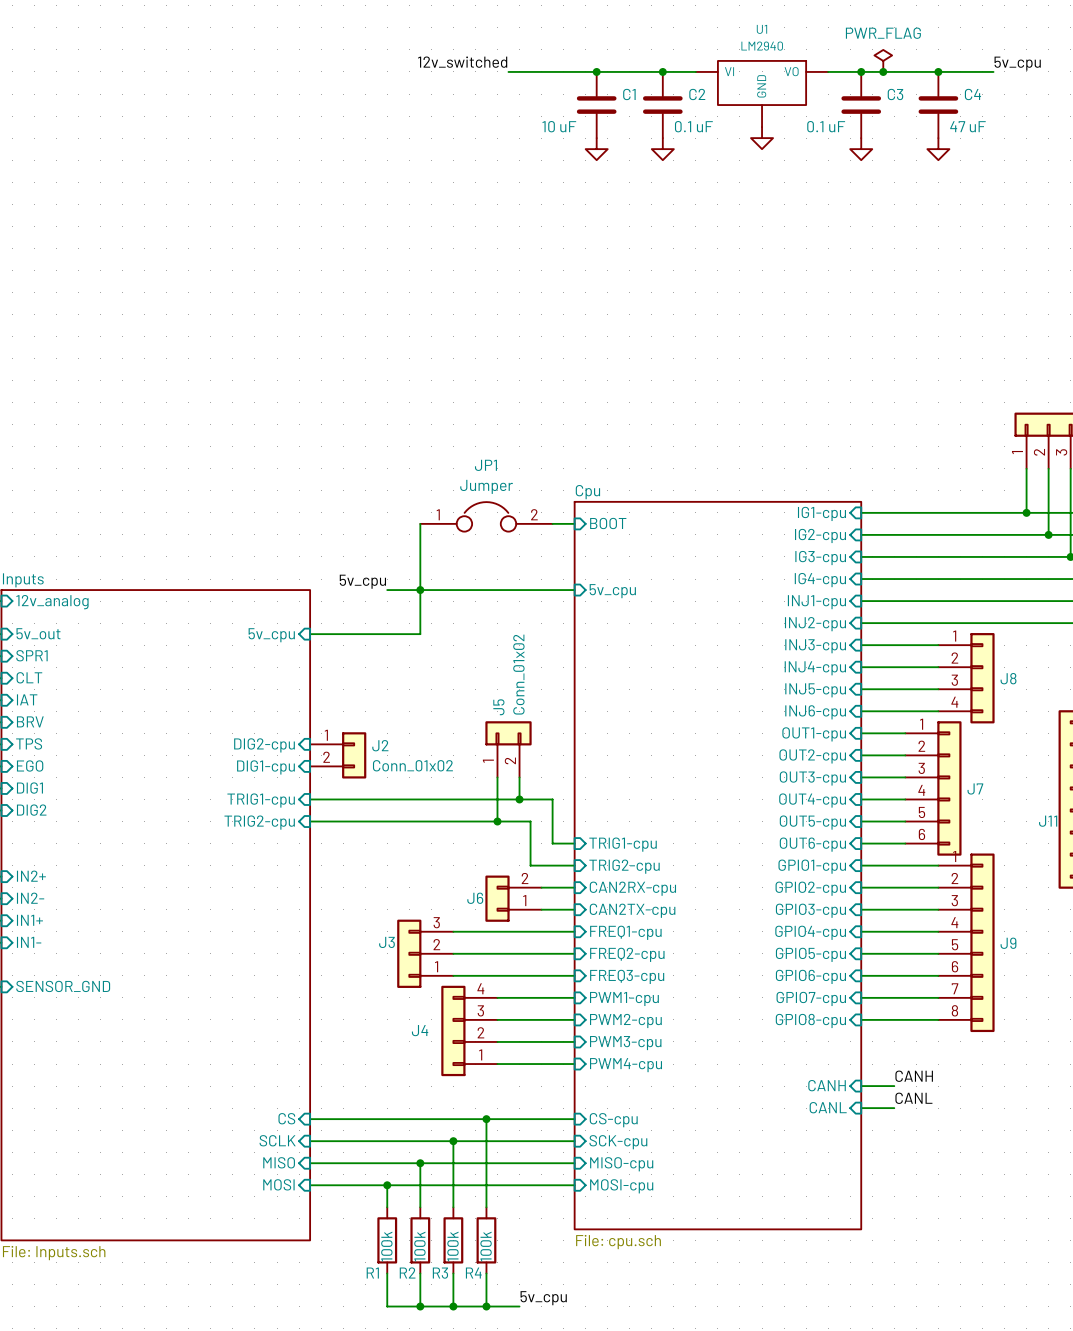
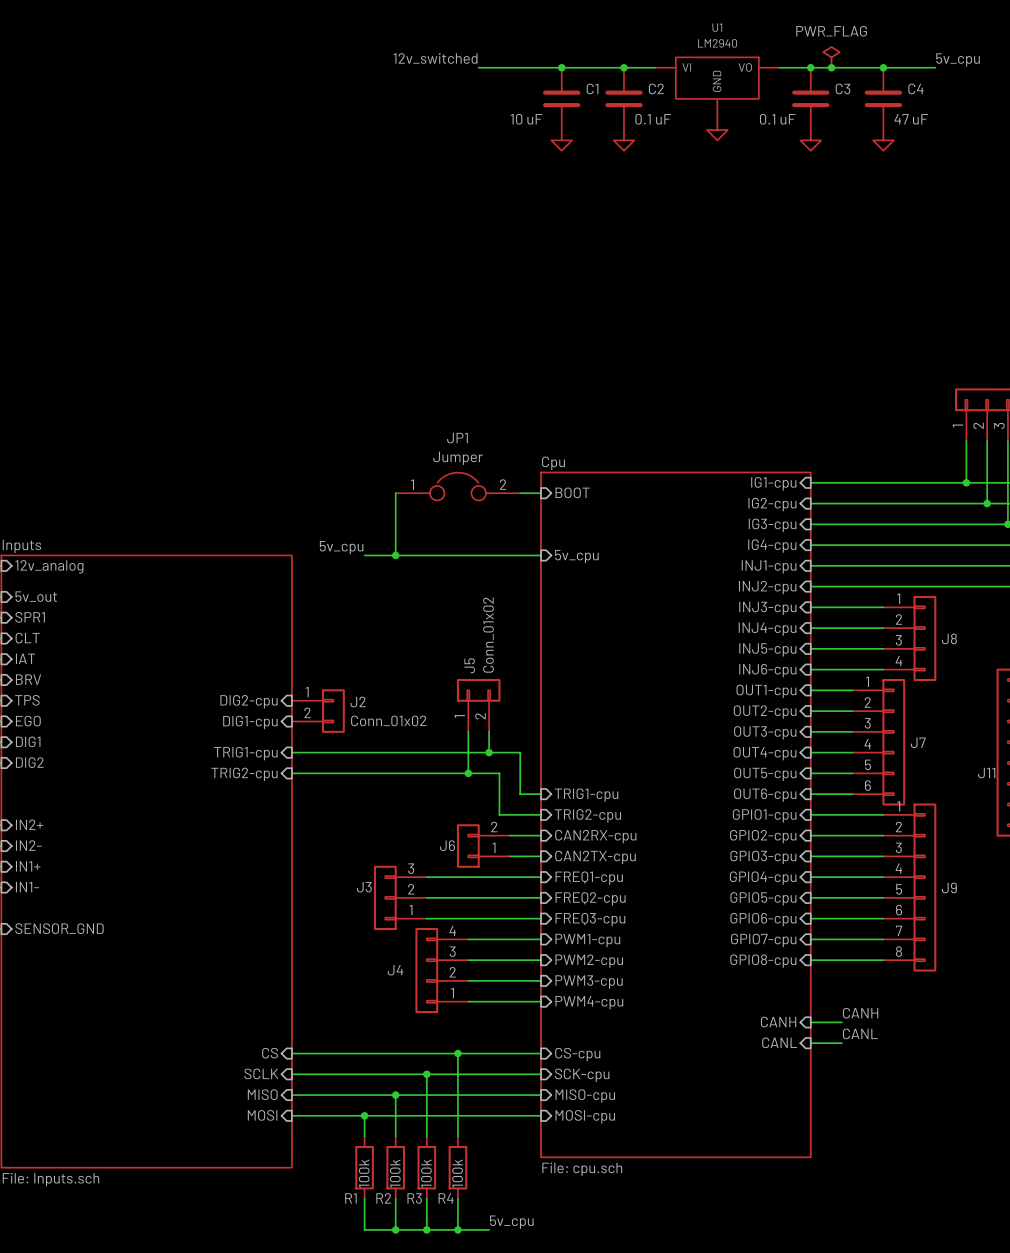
wire: (420, 590) (420, 634) (310, 634) -> none
sheet pin: 5v_cpu (271, 635) -> none

